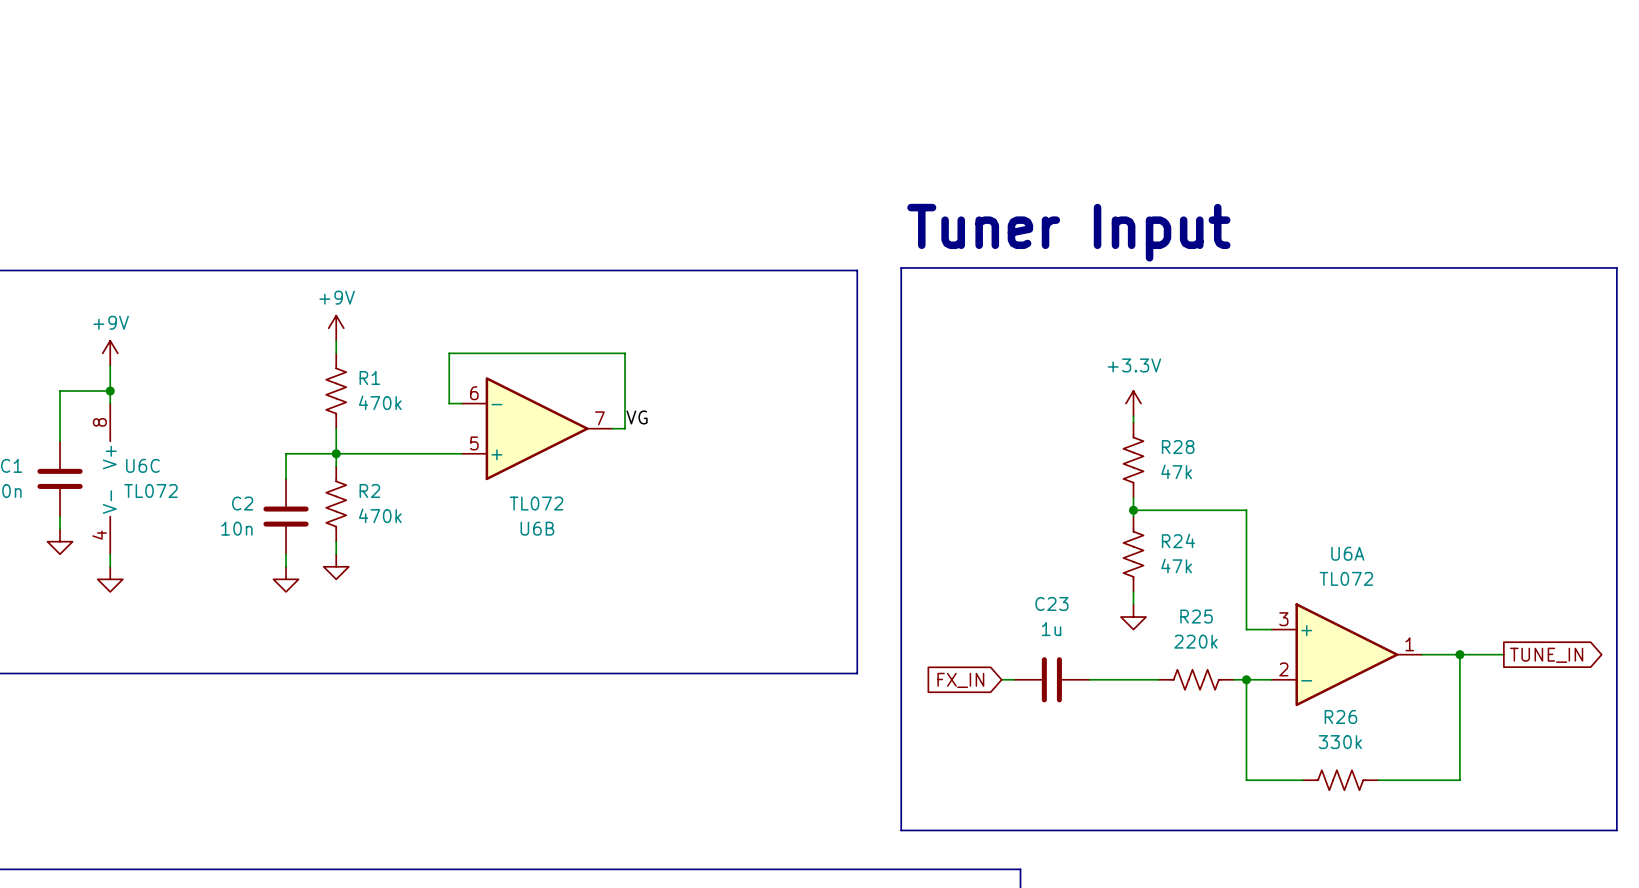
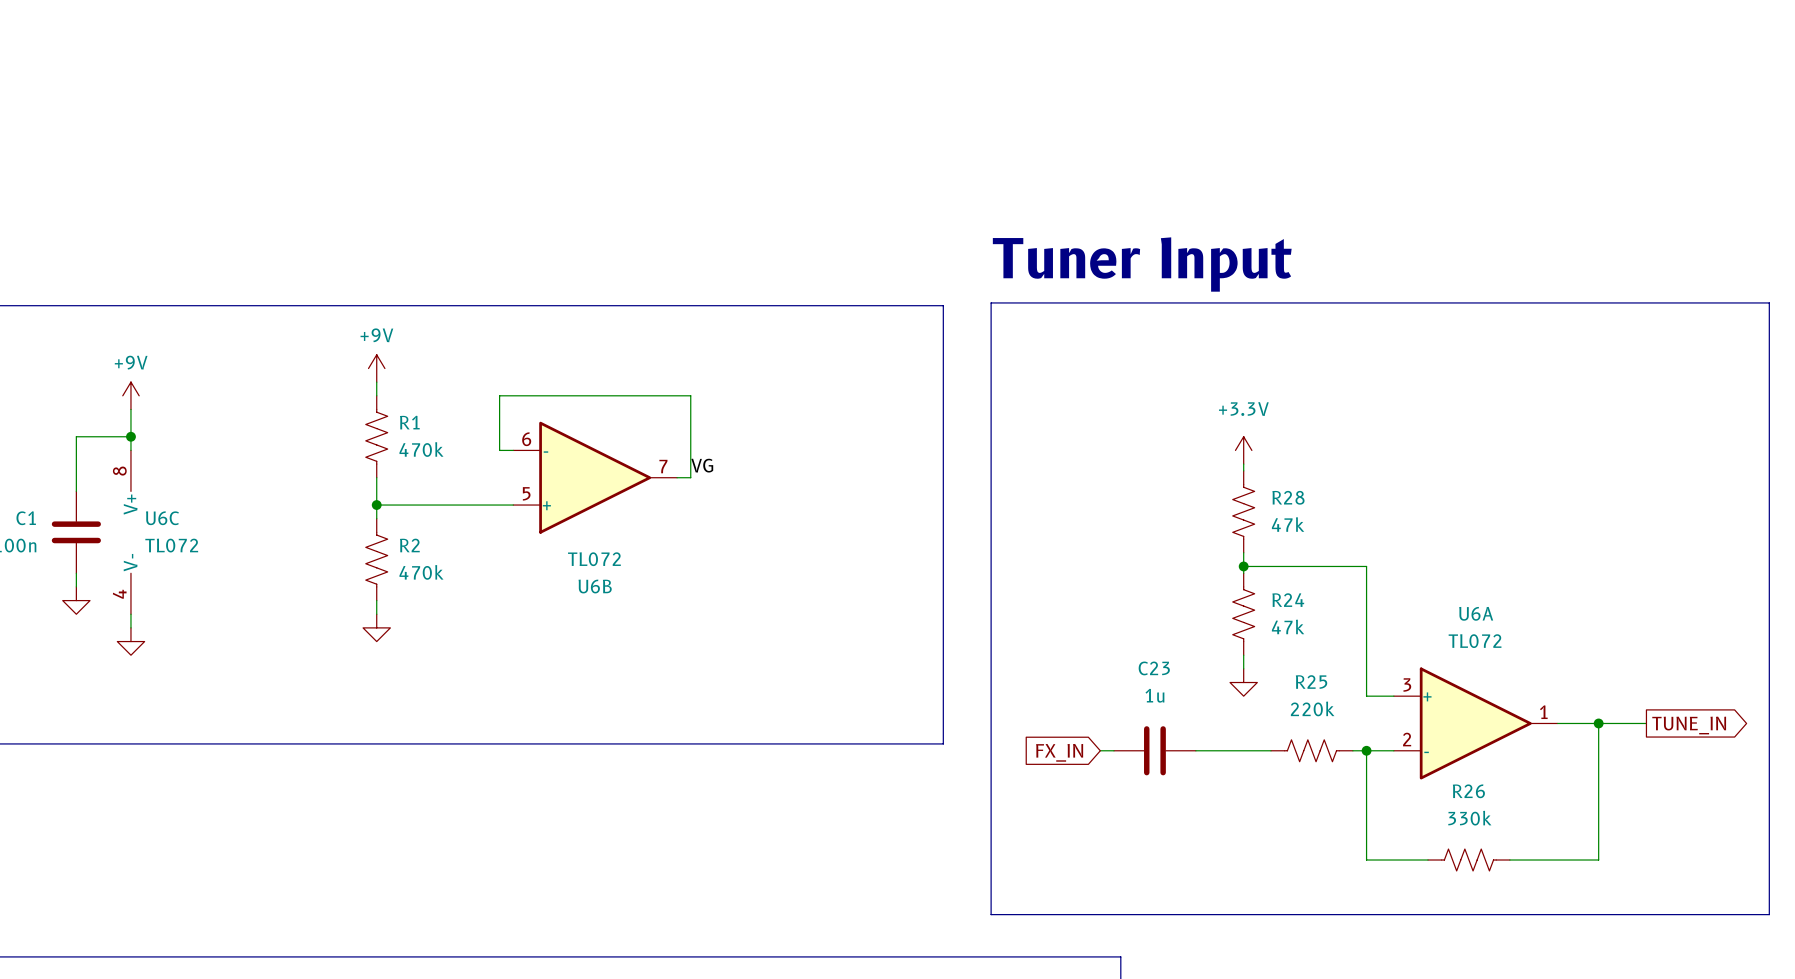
wire: (336, 453) (286, 453) (286, 478) -> none
C2: 10n (286, 516) -> none
wire: (286, 554) (286, 566) -> none
power symbol: (286, 579) -> none

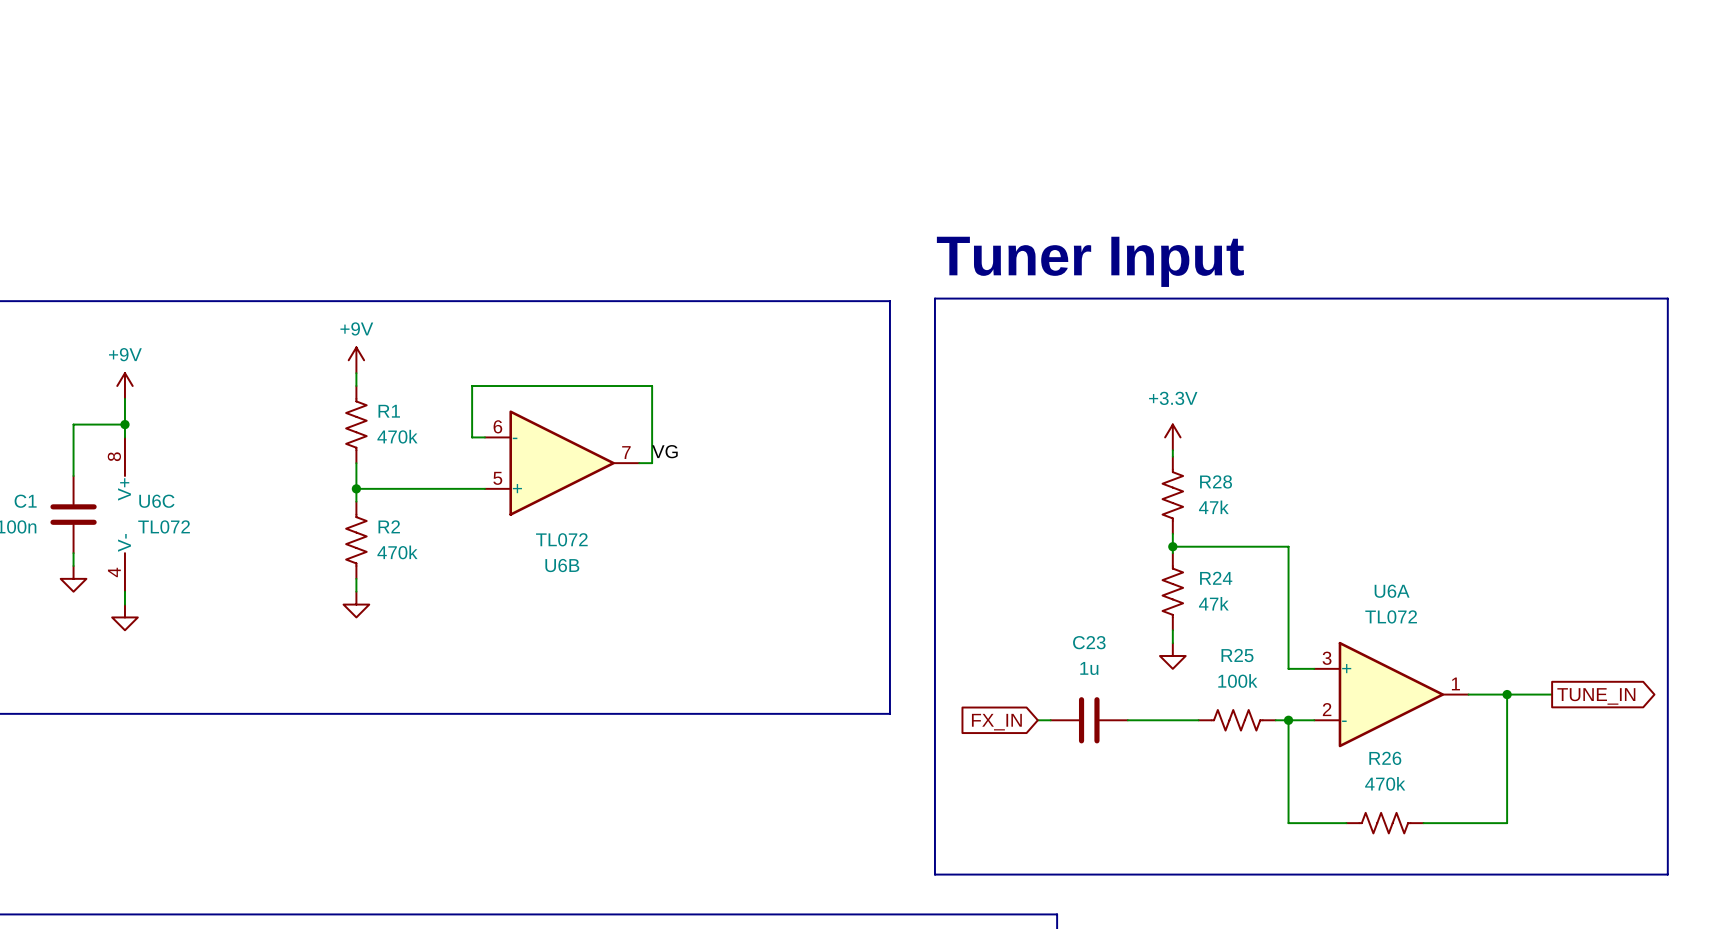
R25 value: 220k (1312, 708) -> 100k (1237, 680)
R26 value: 330k (1469, 818) -> 470k (1385, 783)

